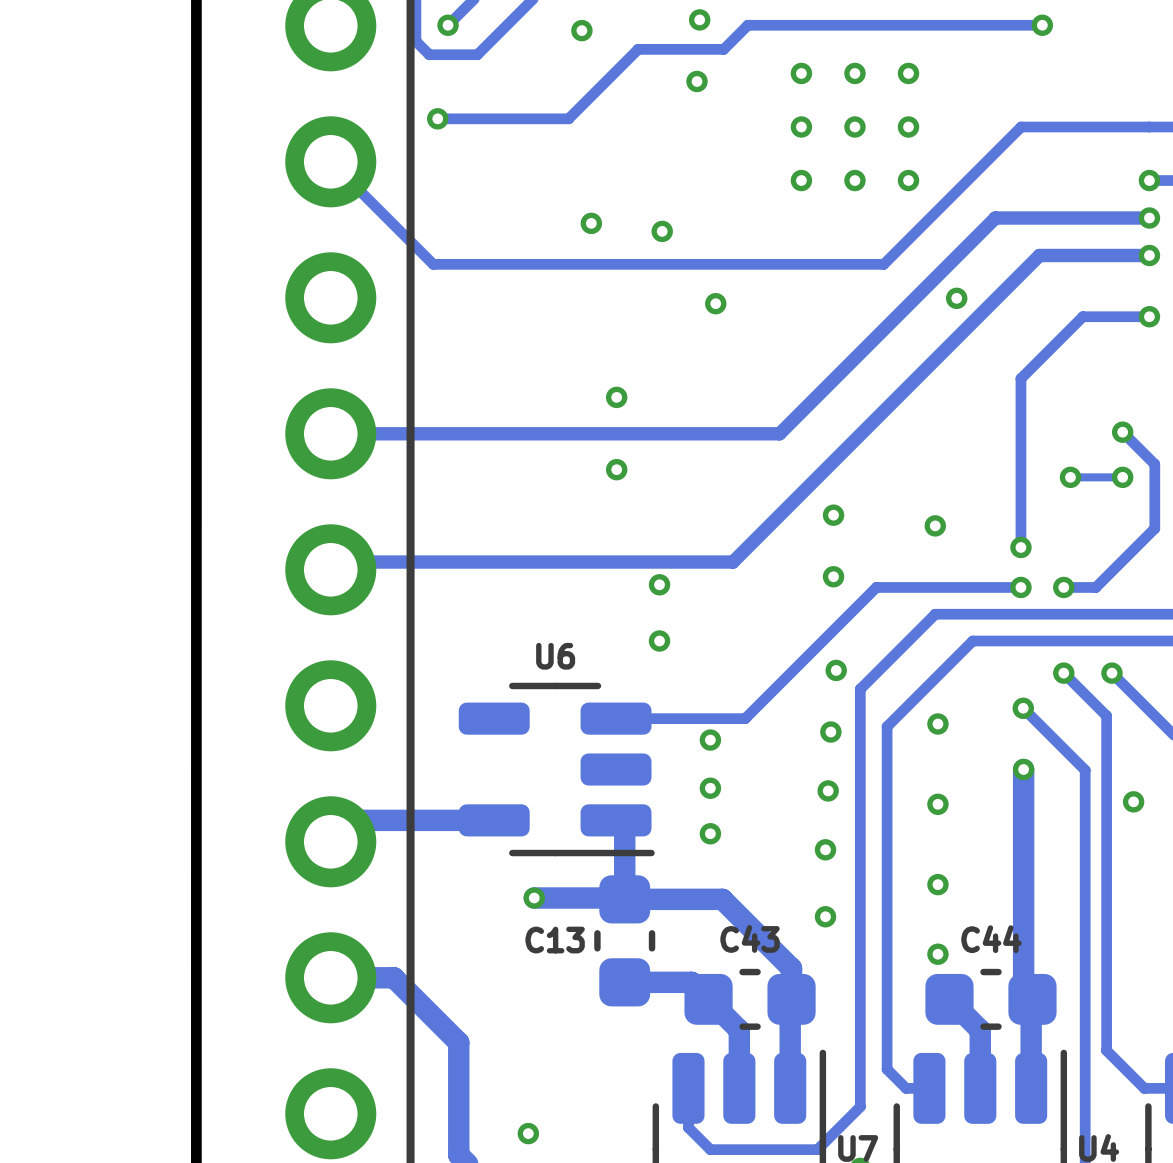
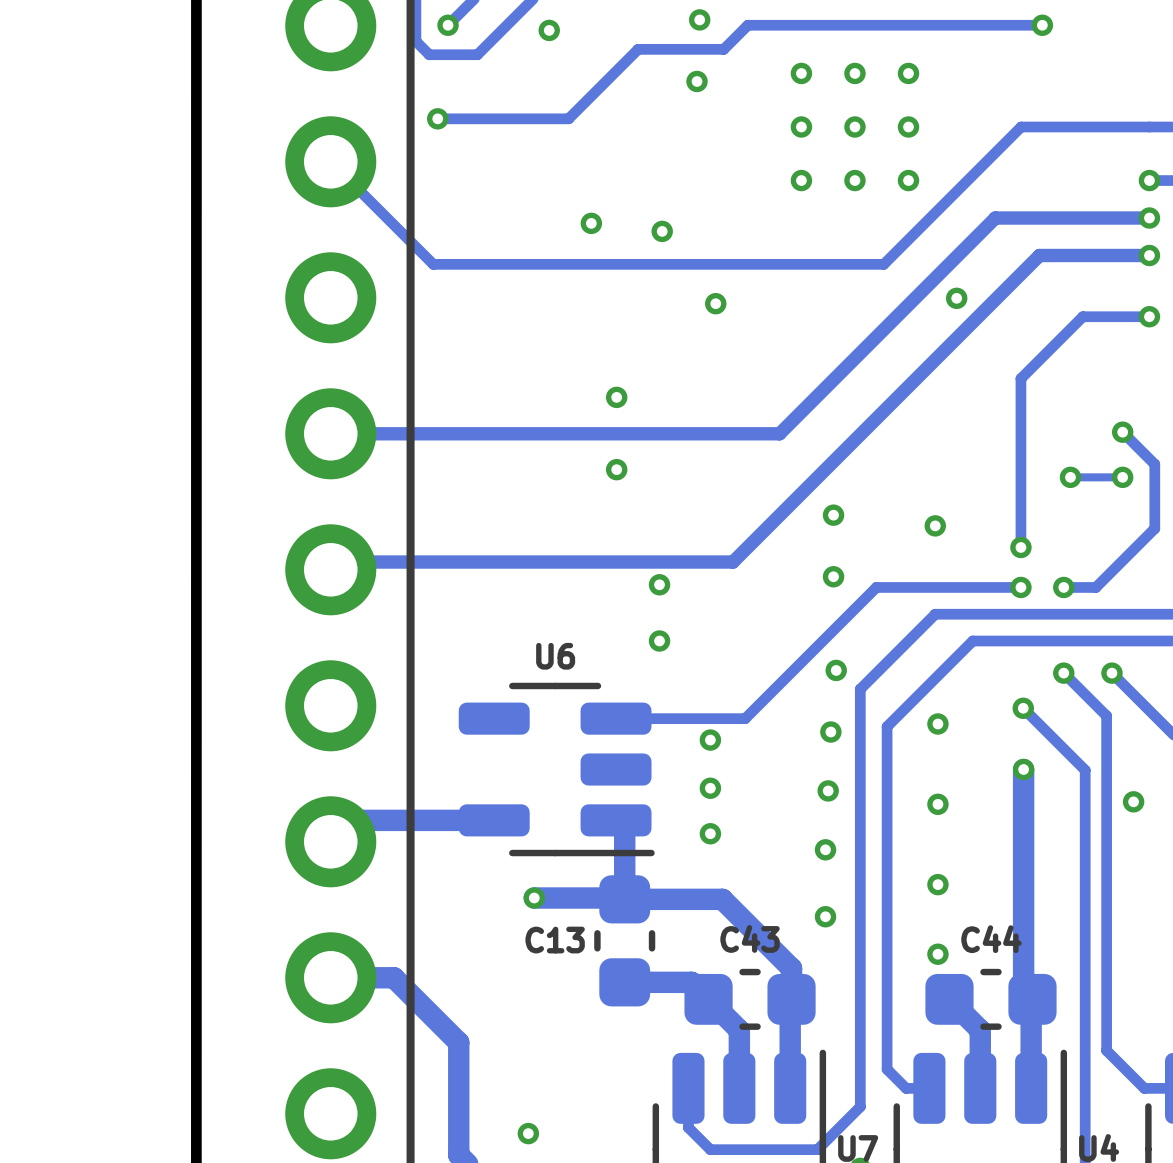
via position: (581, 30) -> (549, 30)

